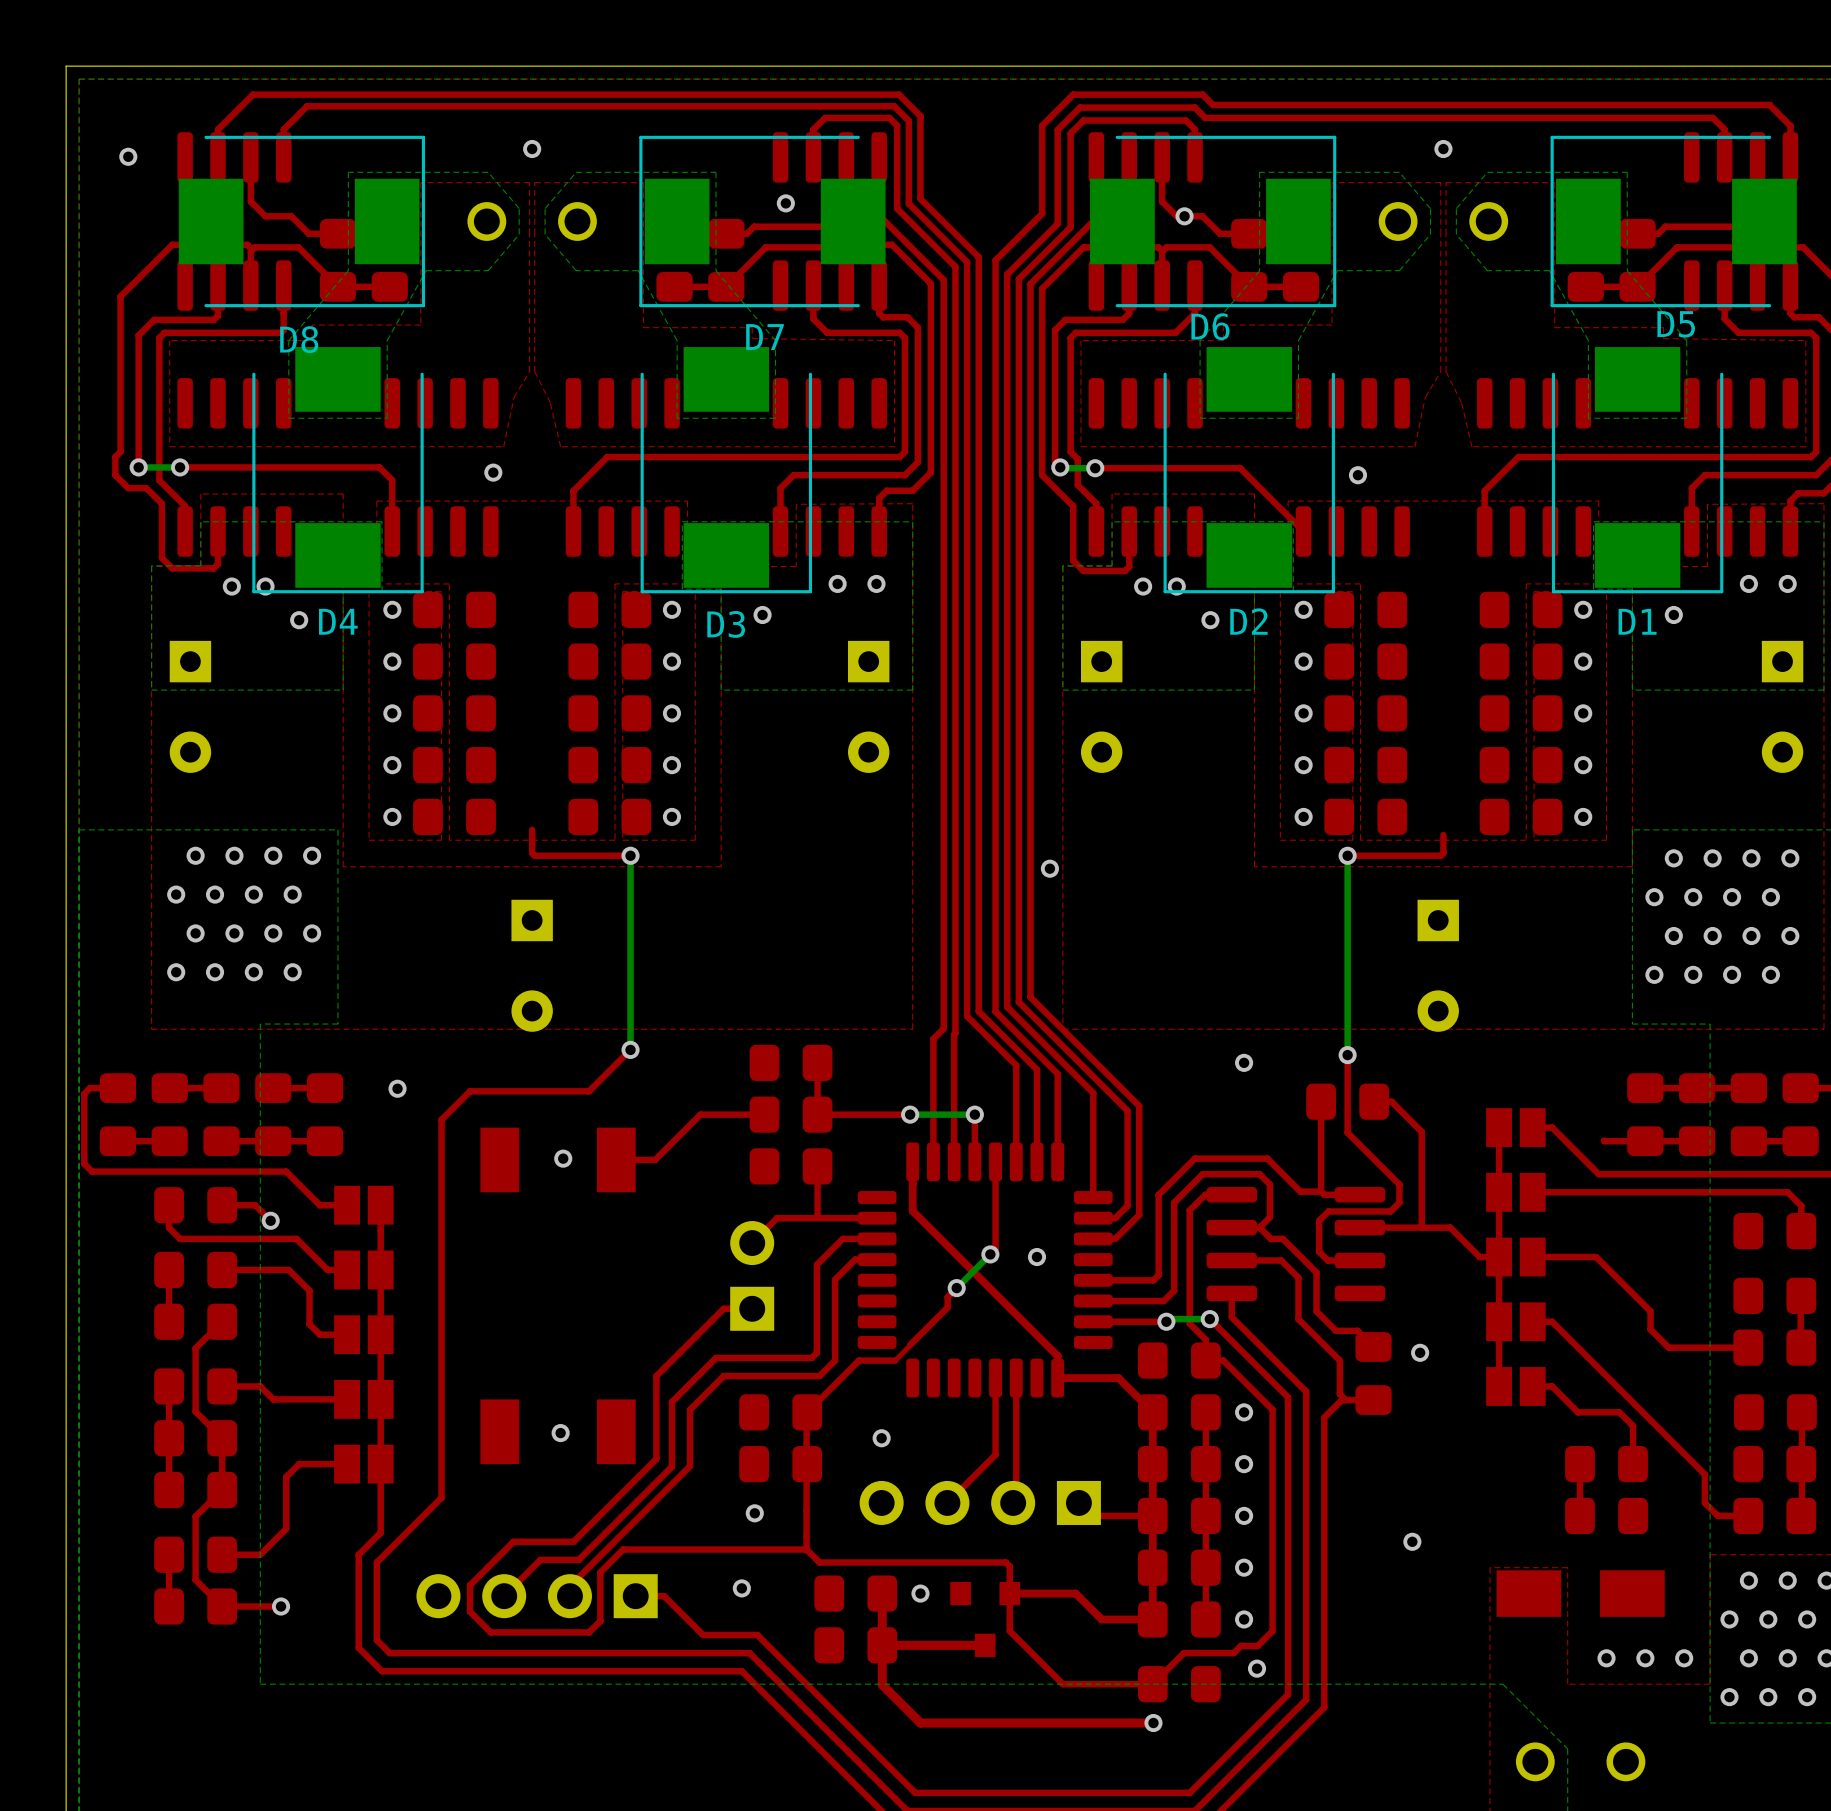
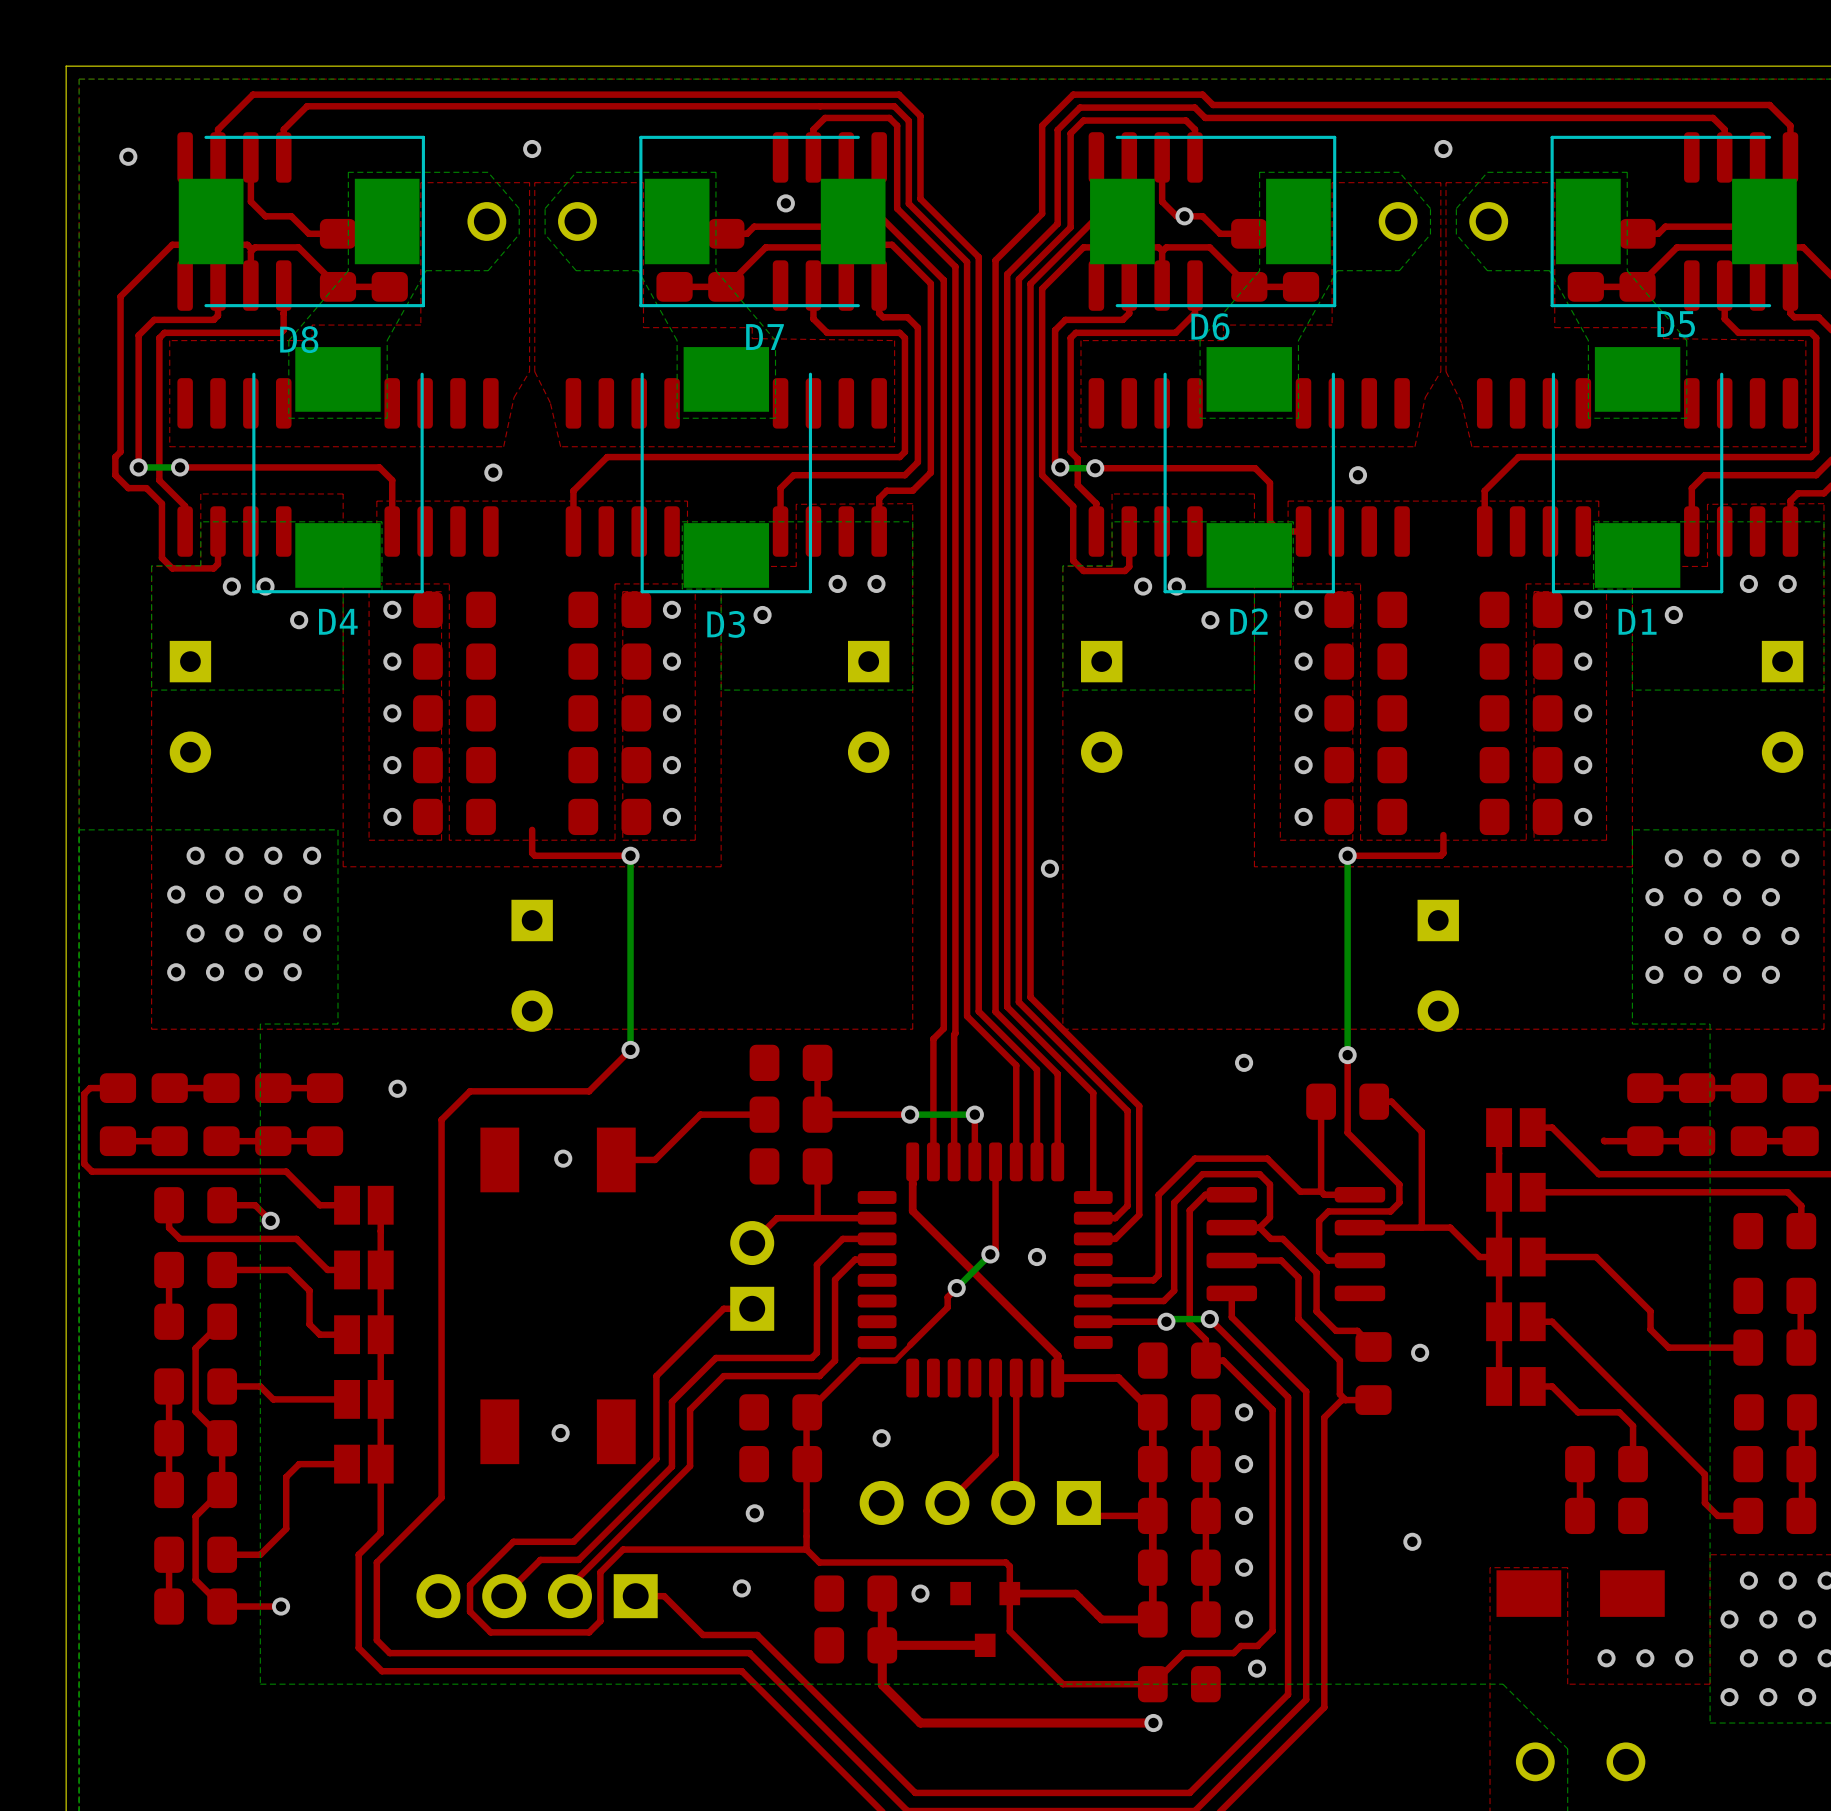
top track: (1240, 468) (1303, 531) -> (1240, 468) (1255, 468) (1269, 482) (1269, 521) (1279, 531) (1303, 531)

